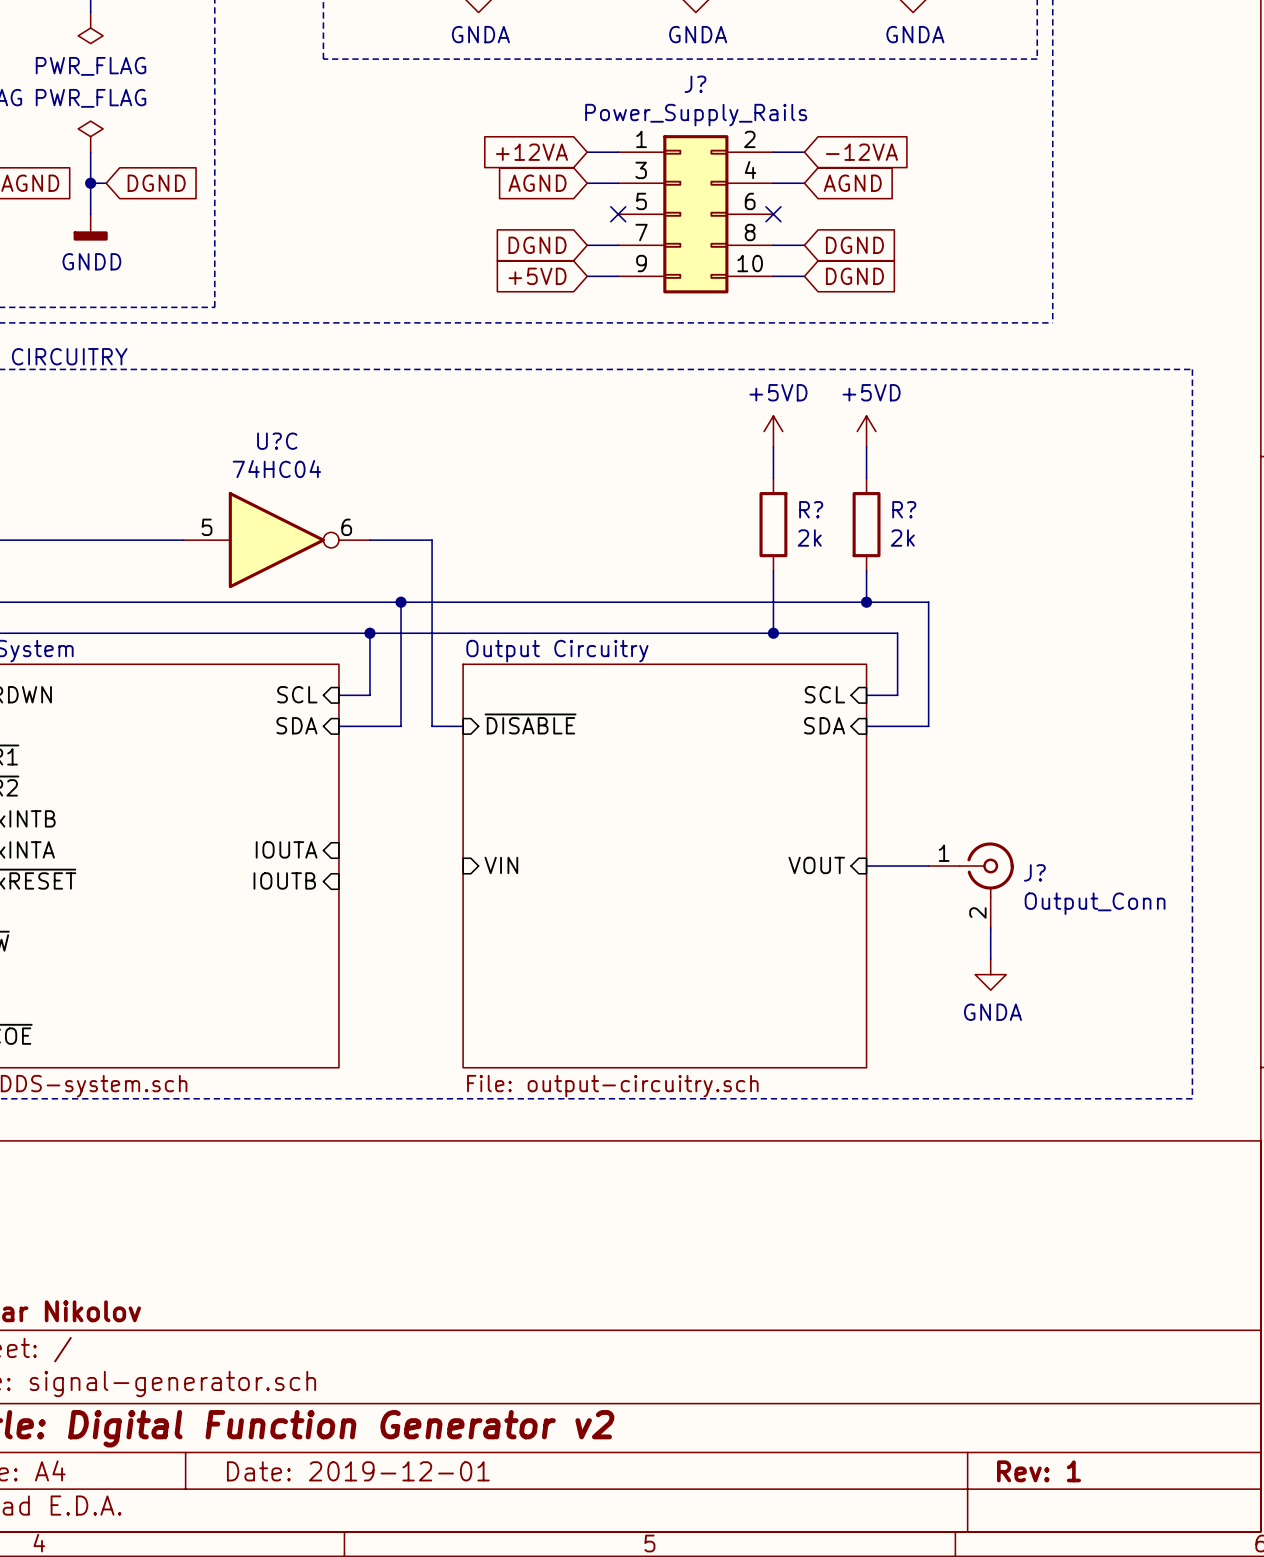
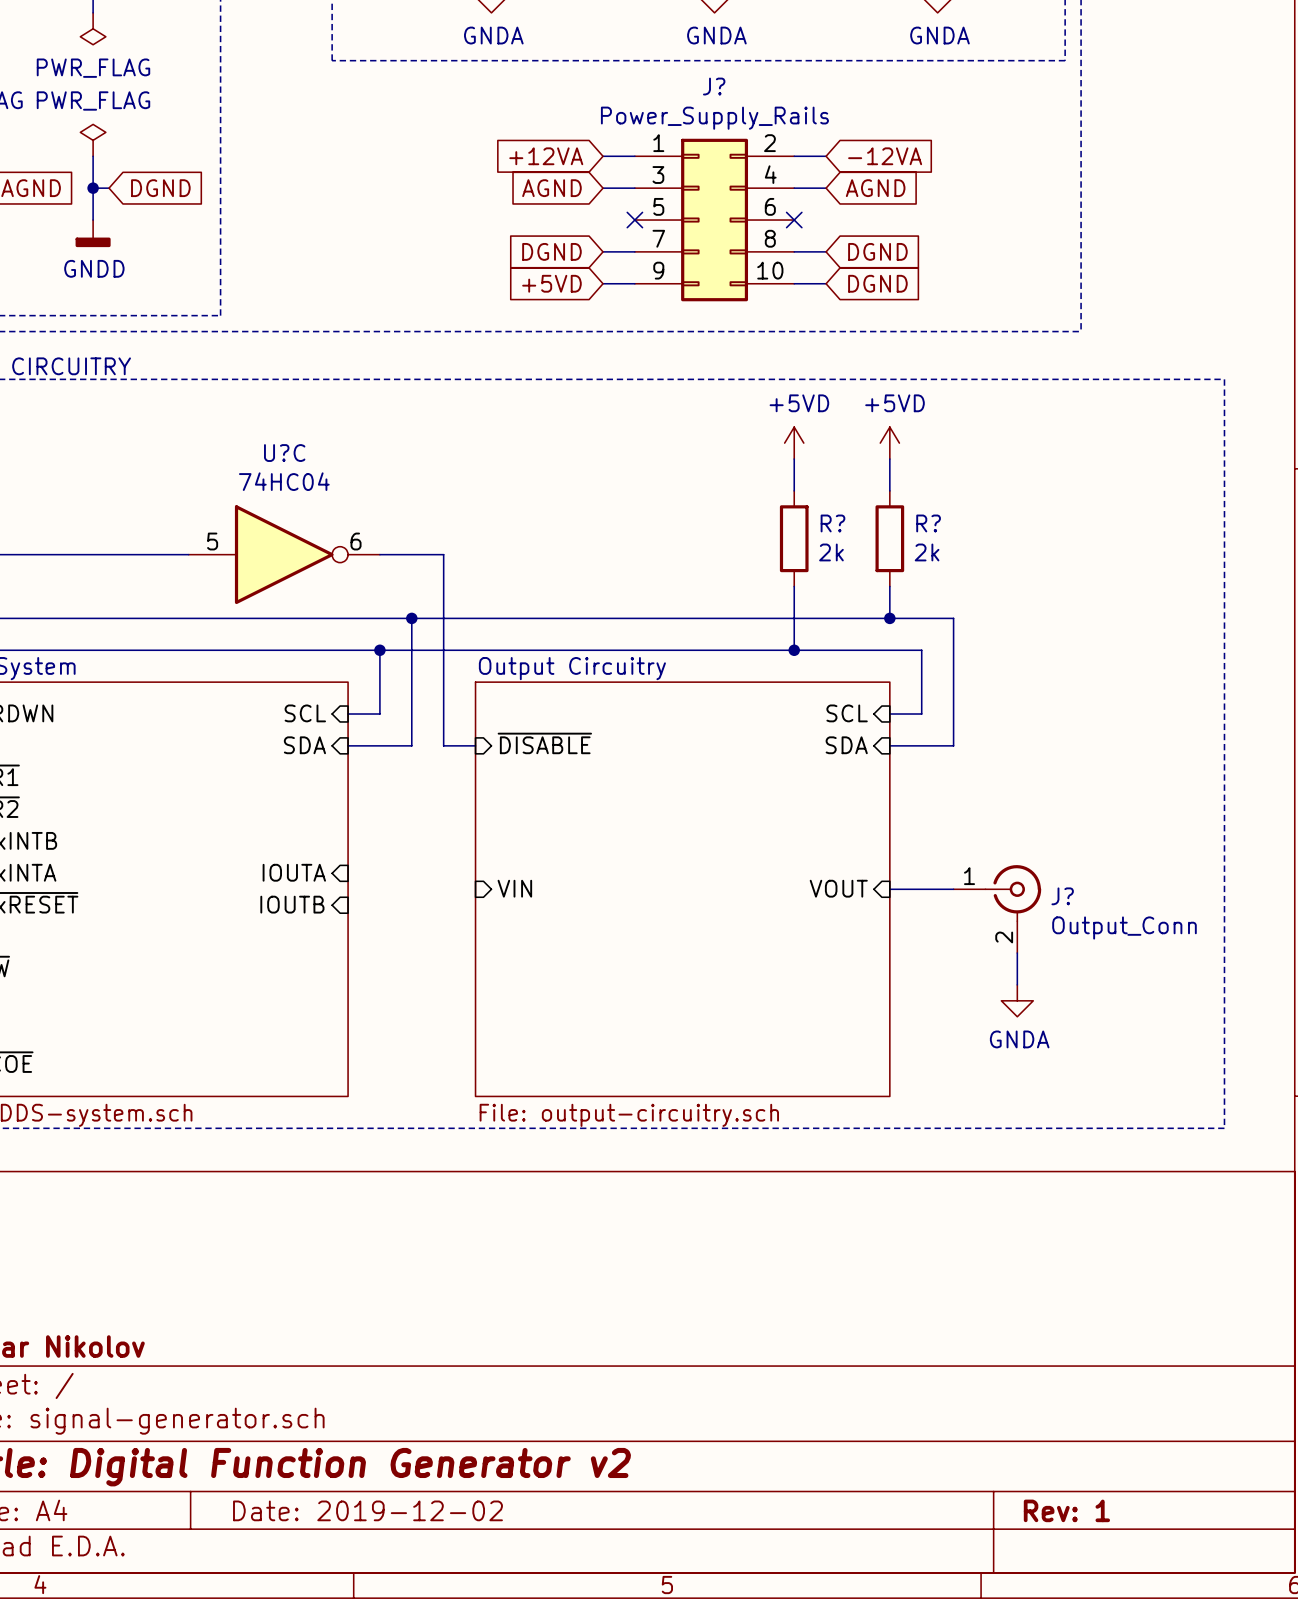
title block: Date: 2019-12-01 (358, 1471) -> Date: 2019-12-02 (367, 1510)

